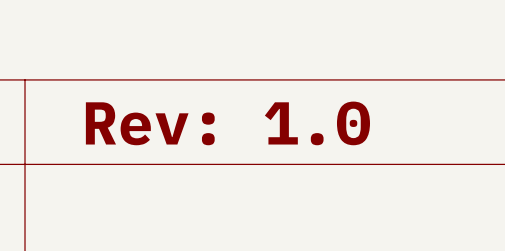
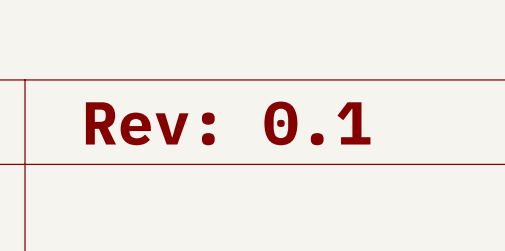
title block: Rev: 1.0 (227, 123) -> Rev: 0.1 (228, 123)

